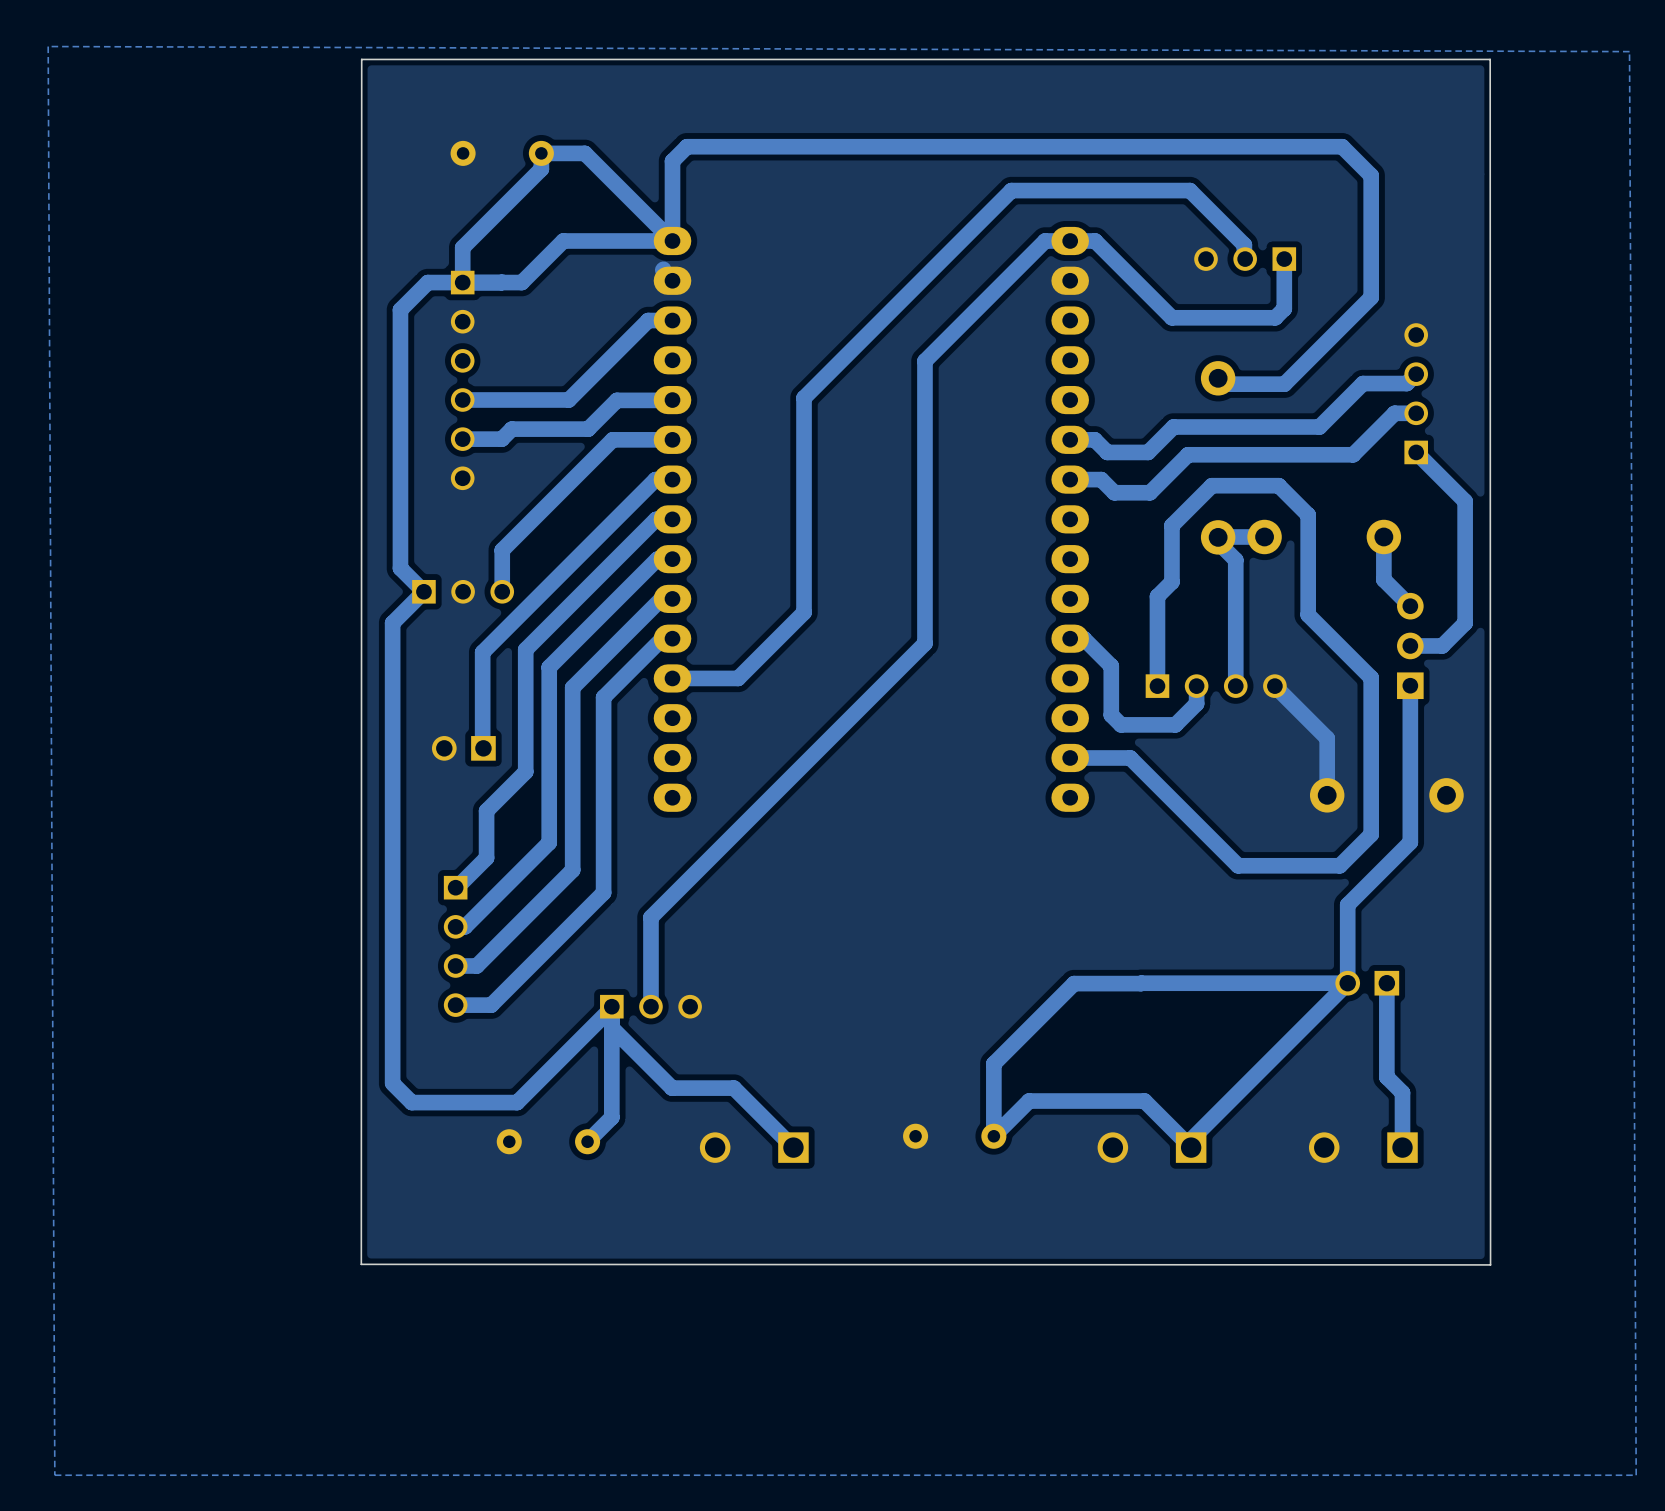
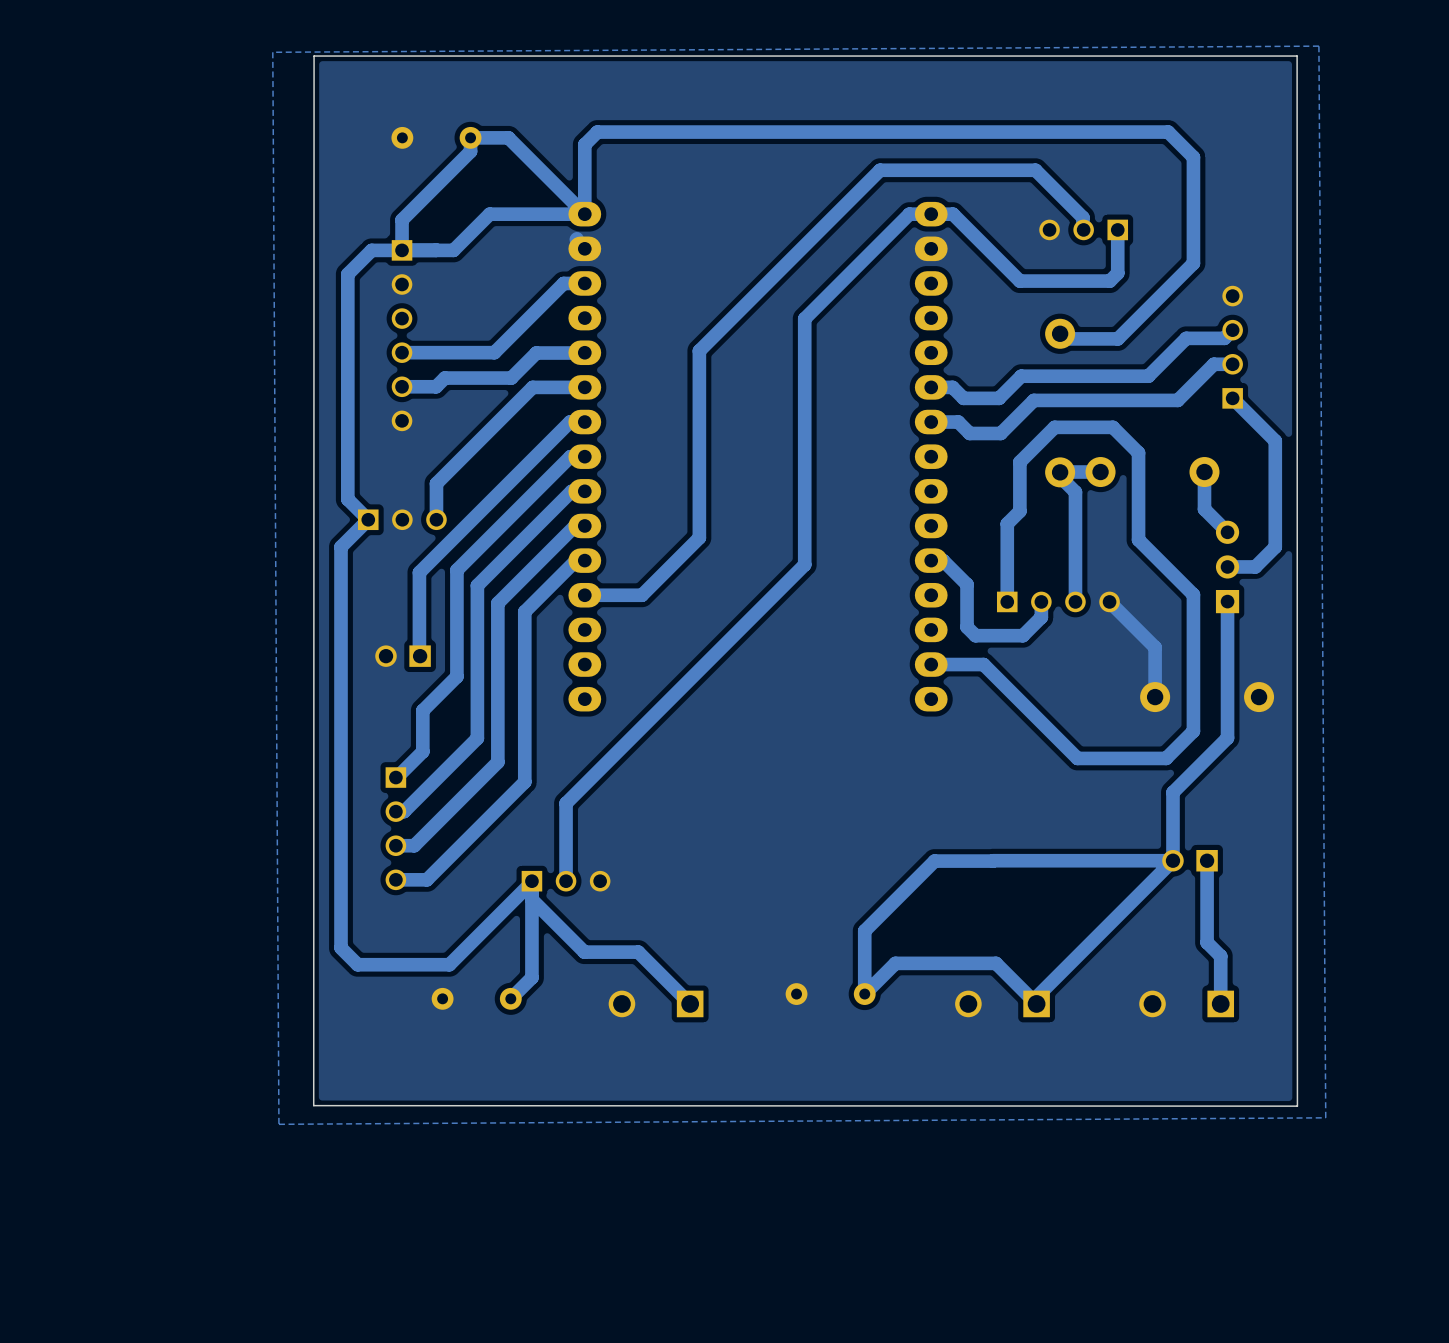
bottom zone outline: (48, 46) (1629, 51) (1636, 1475) (54, 1475) (48, 46) -> (1318, 46) (1325, 1117) (278, 1124) (272, 52) (1318, 46)

